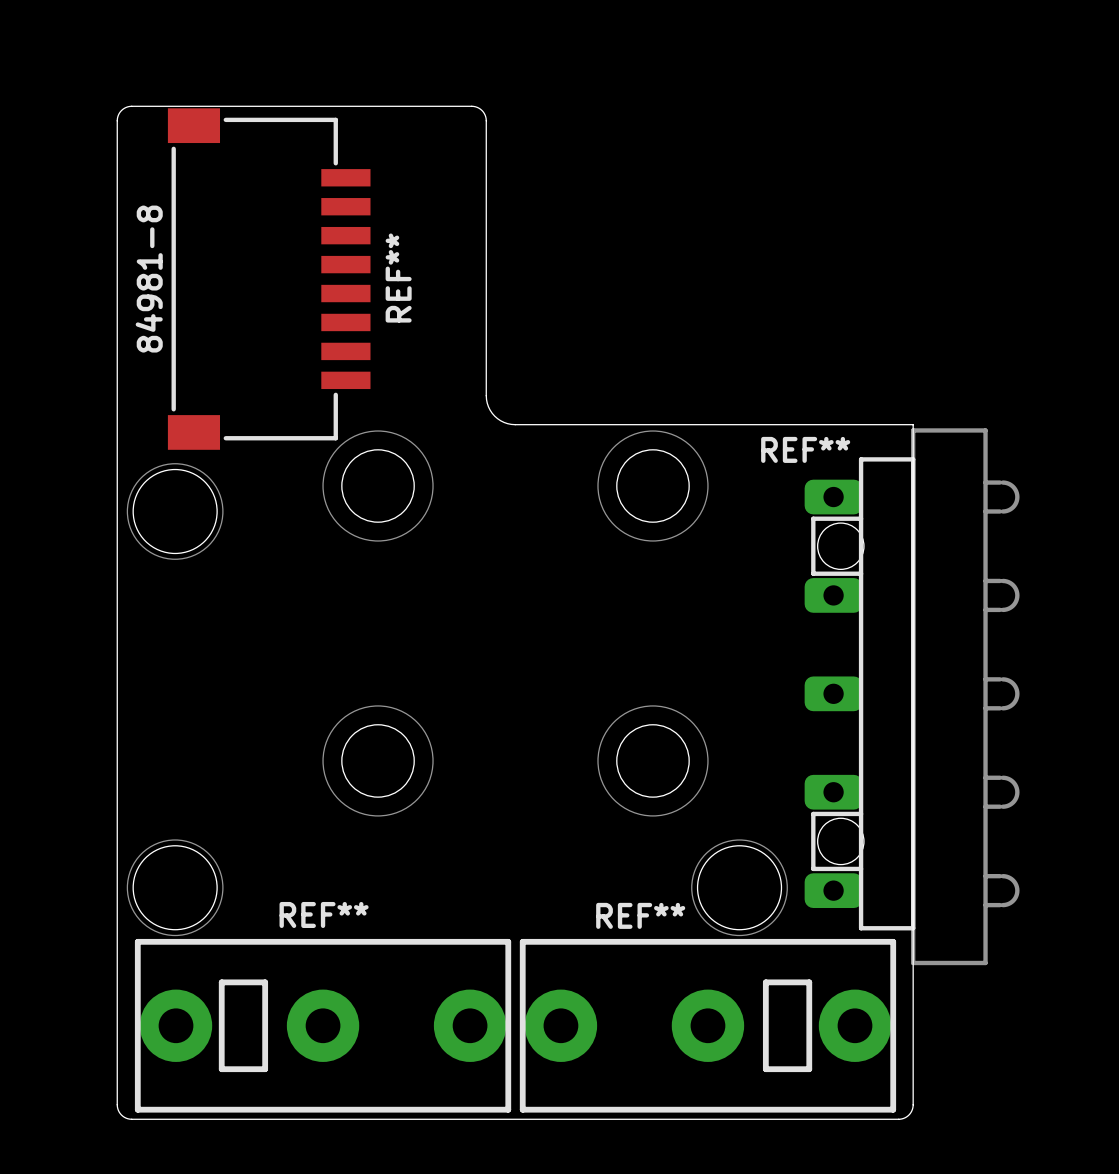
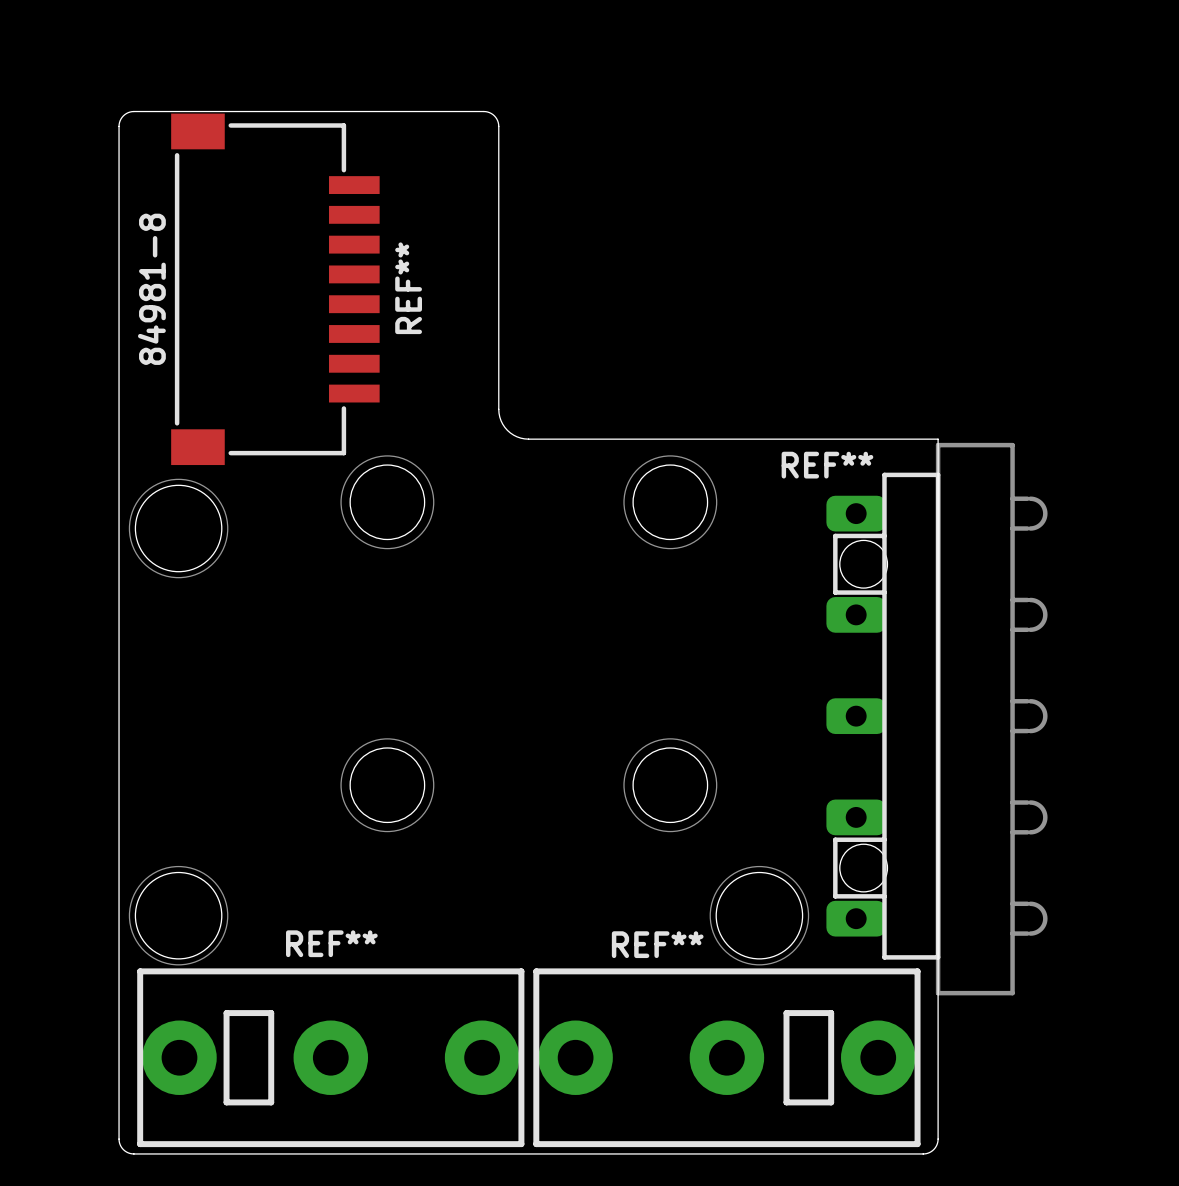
drawing shape: [322, 430, 434, 542] -> [340, 455, 434, 549]
drawing shape: [597, 430, 709, 542] -> [623, 455, 717, 549]
drawing shape: [322, 705, 434, 817] -> [340, 738, 434, 832]
drawing shape: [597, 705, 709, 817] -> [623, 738, 717, 832]

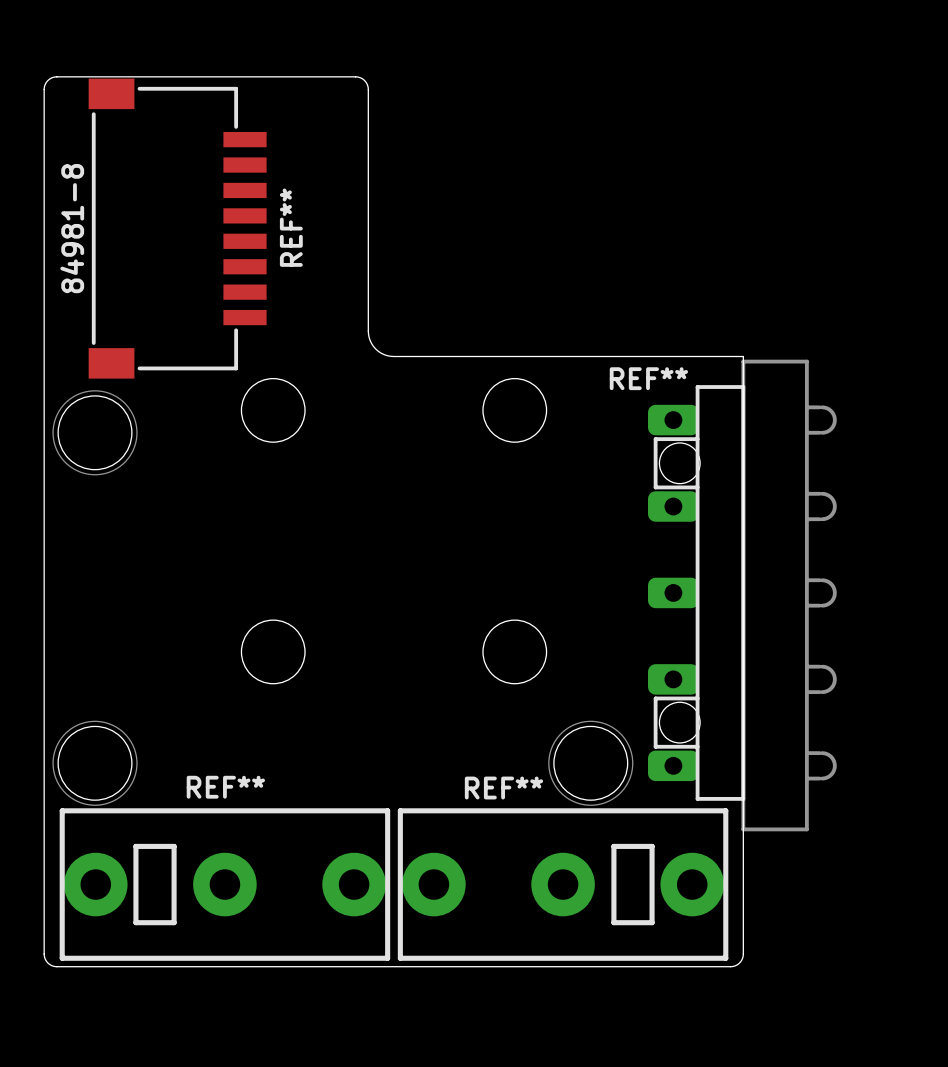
drawing: [340, 455, 434, 549] -> none
drawing: [623, 455, 717, 549] -> none
drawing: [340, 738, 434, 832] -> none
drawing: [623, 738, 717, 832] -> none

